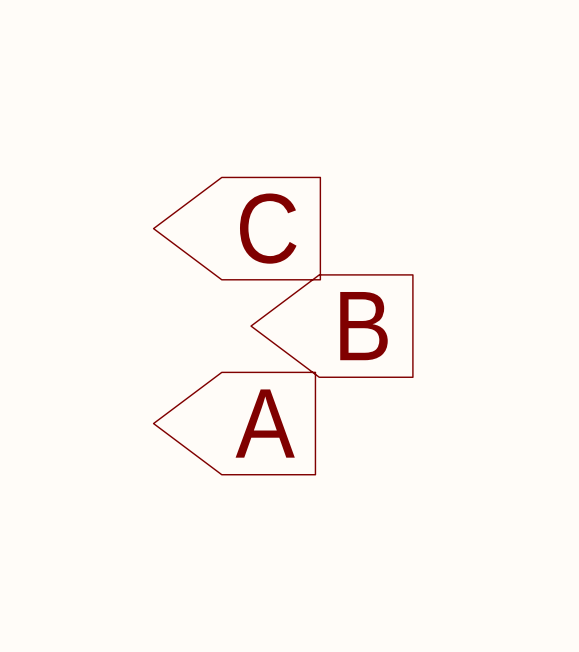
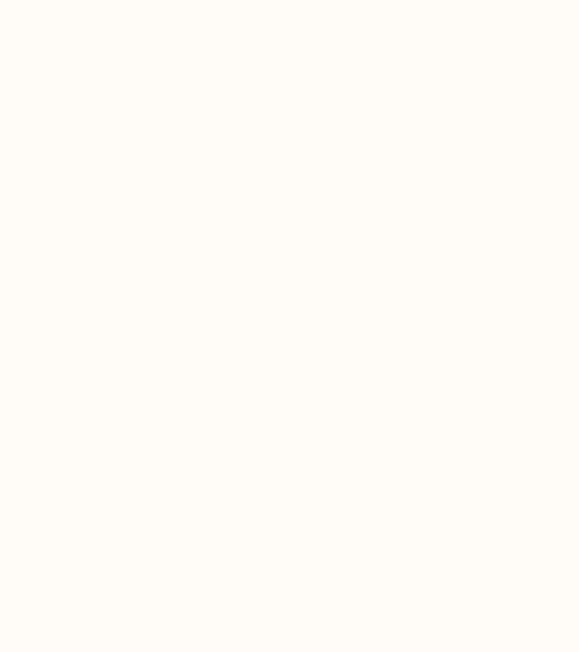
global label: C (268, 228) -> none
global label: B (363, 326) -> none
global label: A (265, 423) -> none

